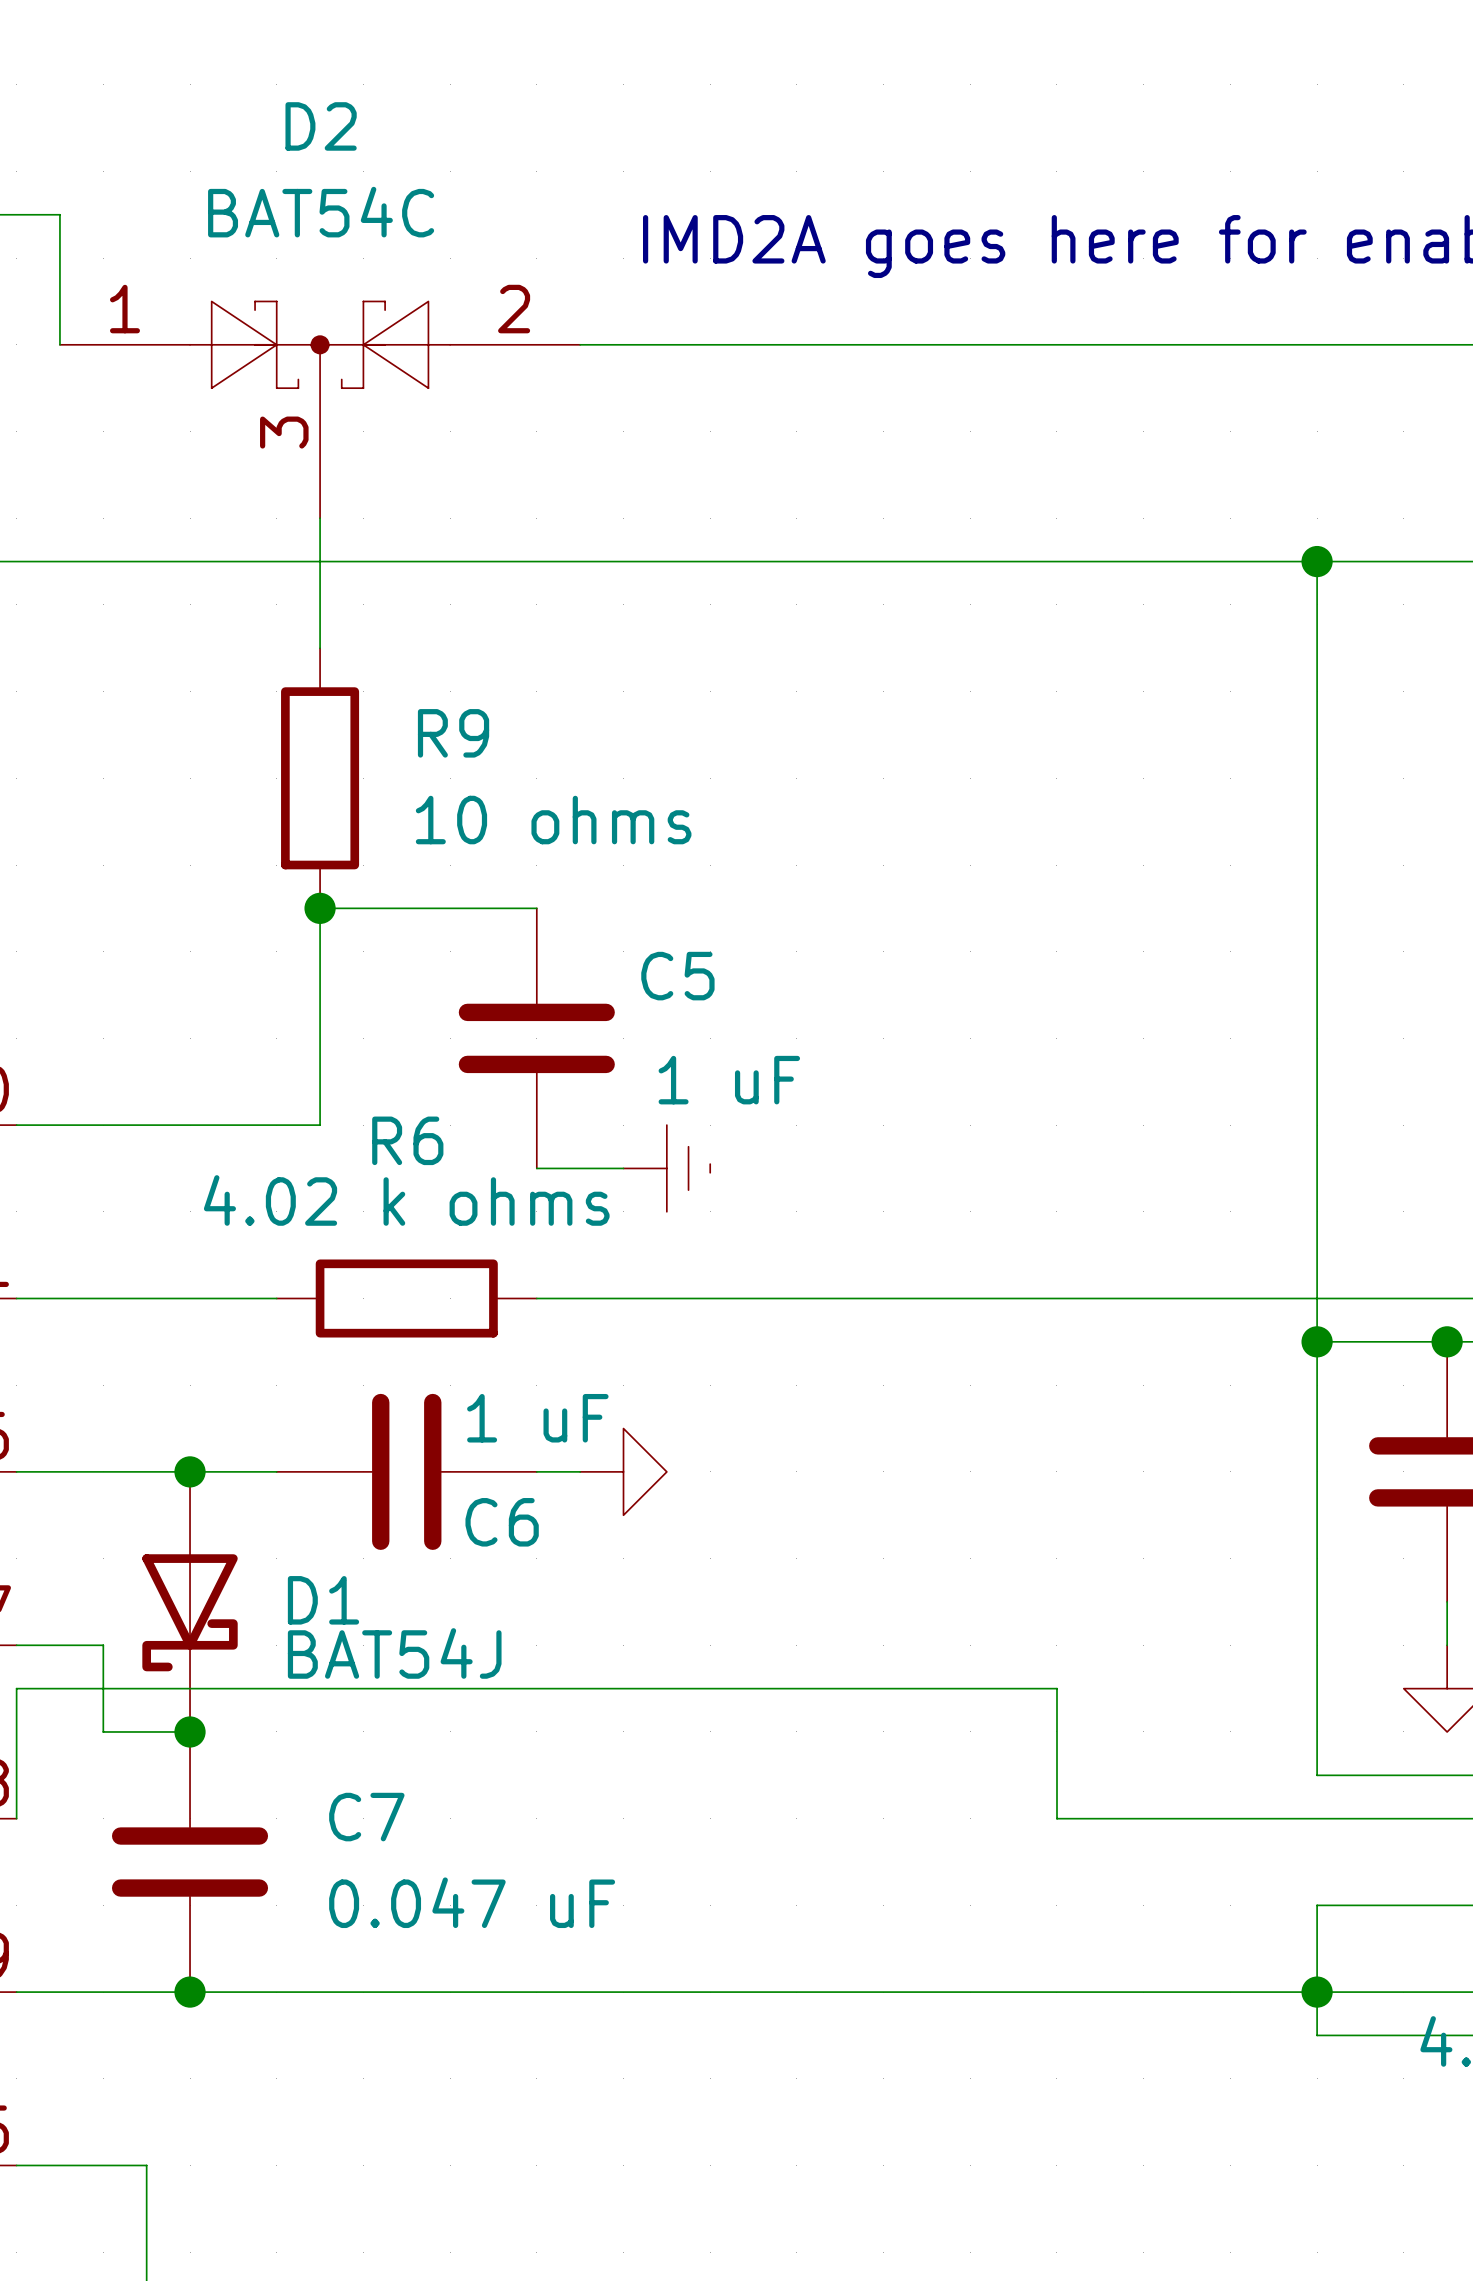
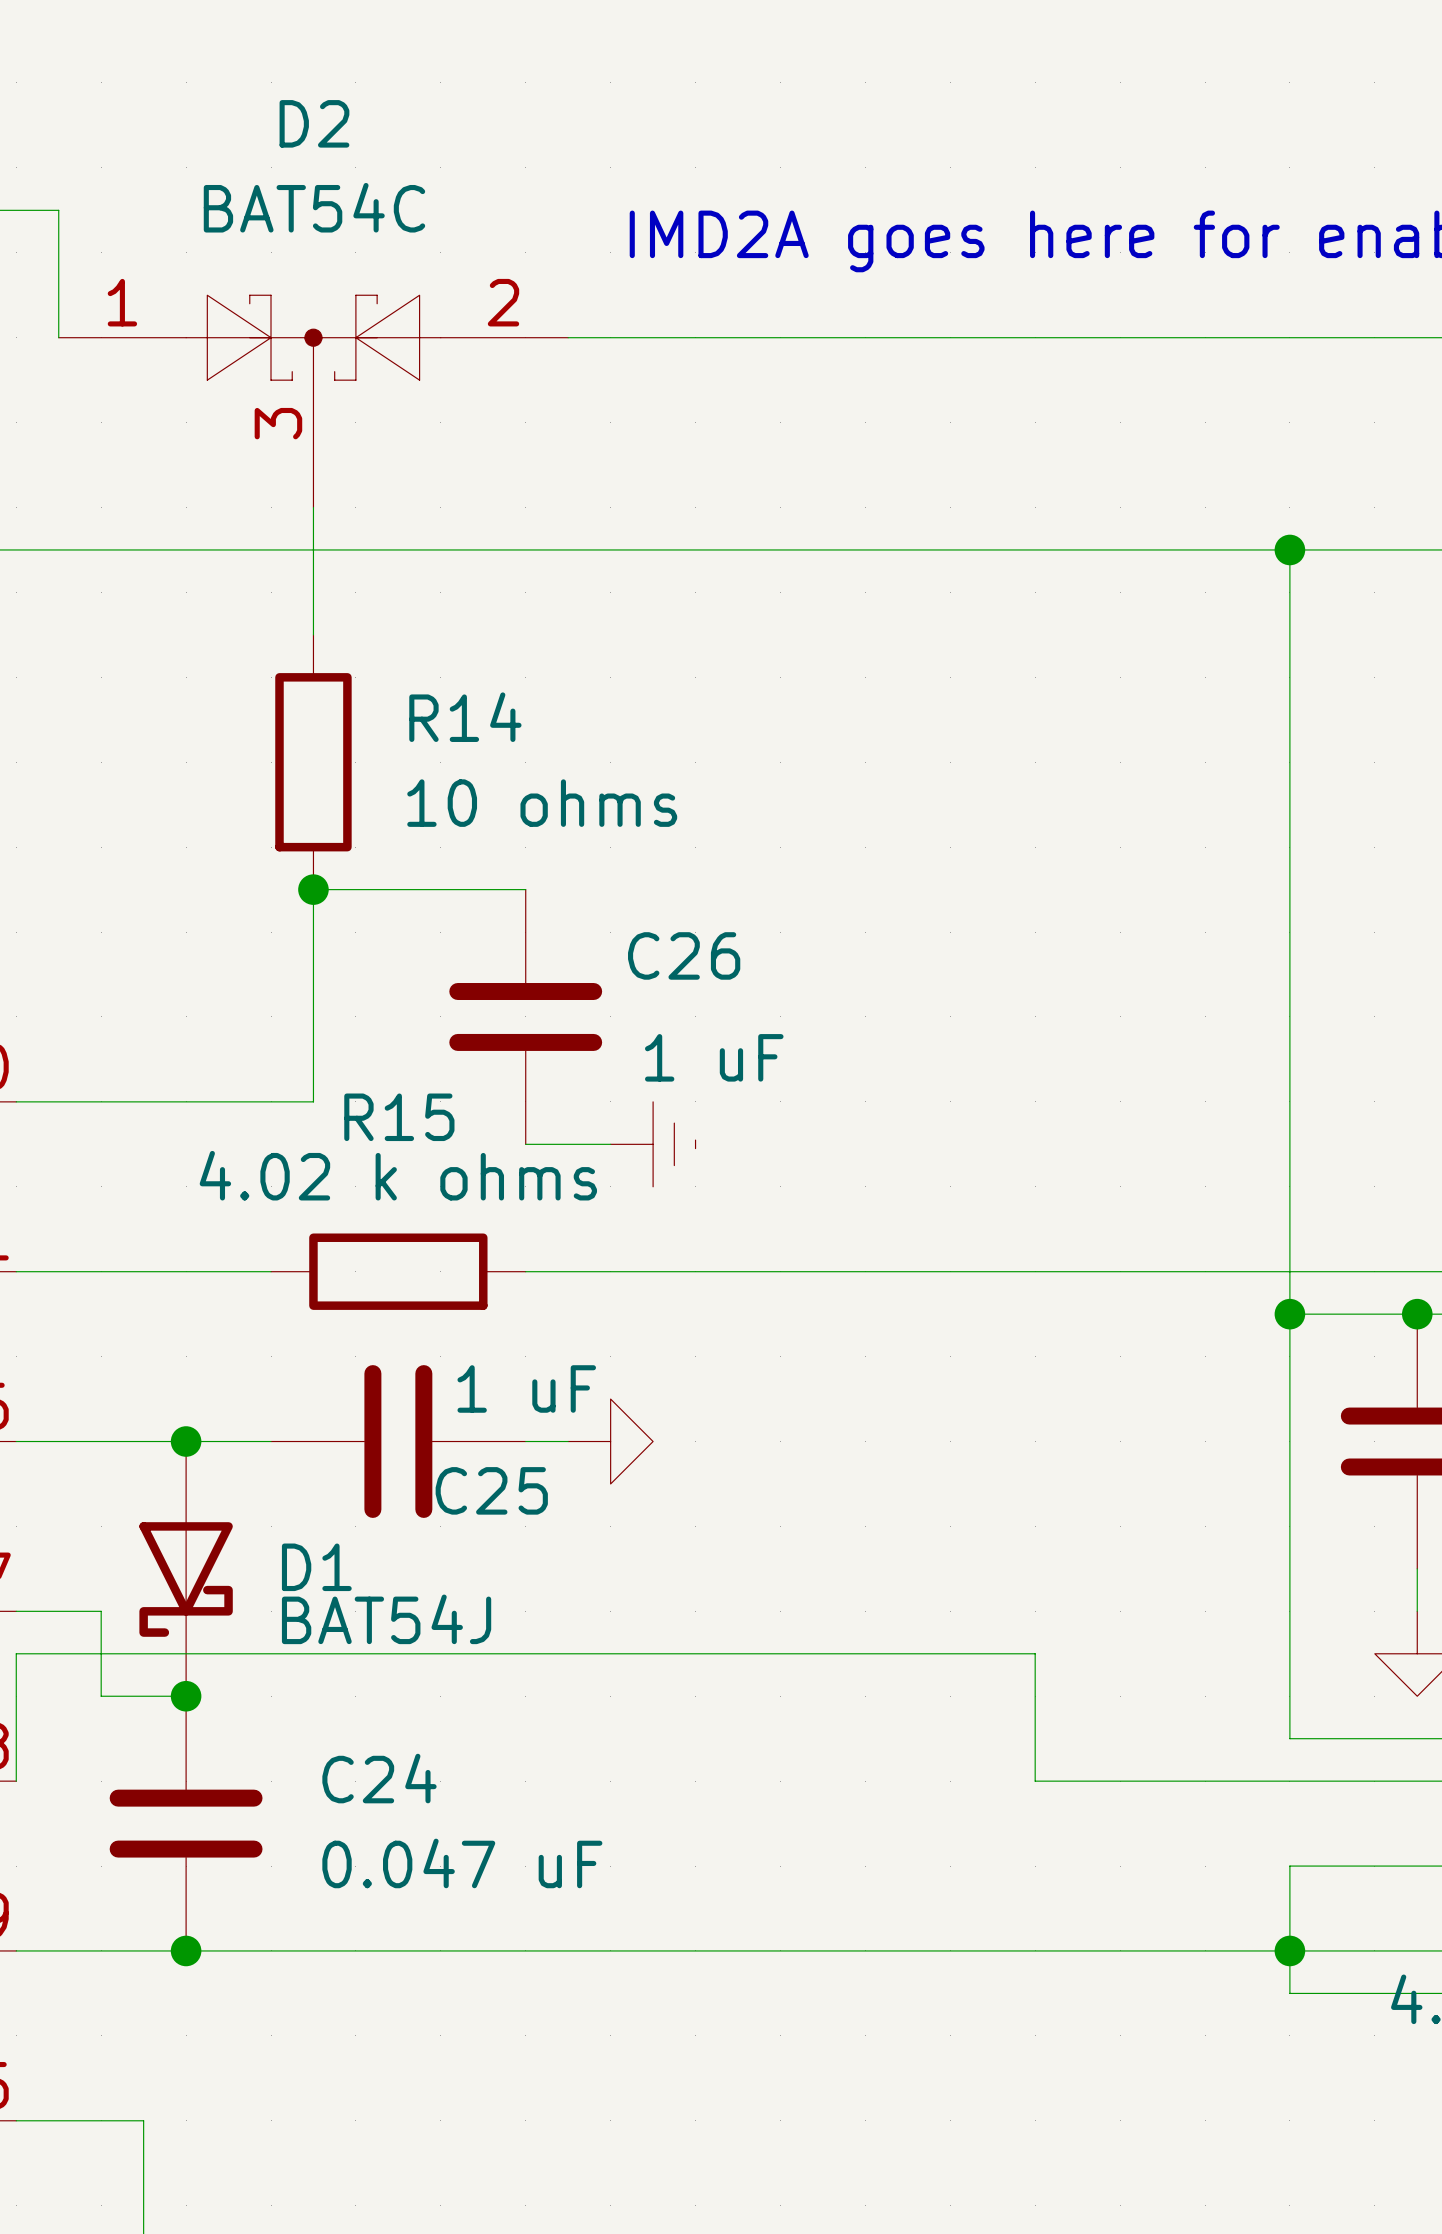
R9 name: R9 (453, 733) -> R14 (465, 717)
C5 name: C5 (677, 976) -> C26 (684, 955)
R6 name: R6 (407, 1140) -> R15 (399, 1117)
C6 name: C6 (502, 1522) -> C25 (491, 1490)
C7 name: C7 (366, 1817) -> C24 (379, 1778)

